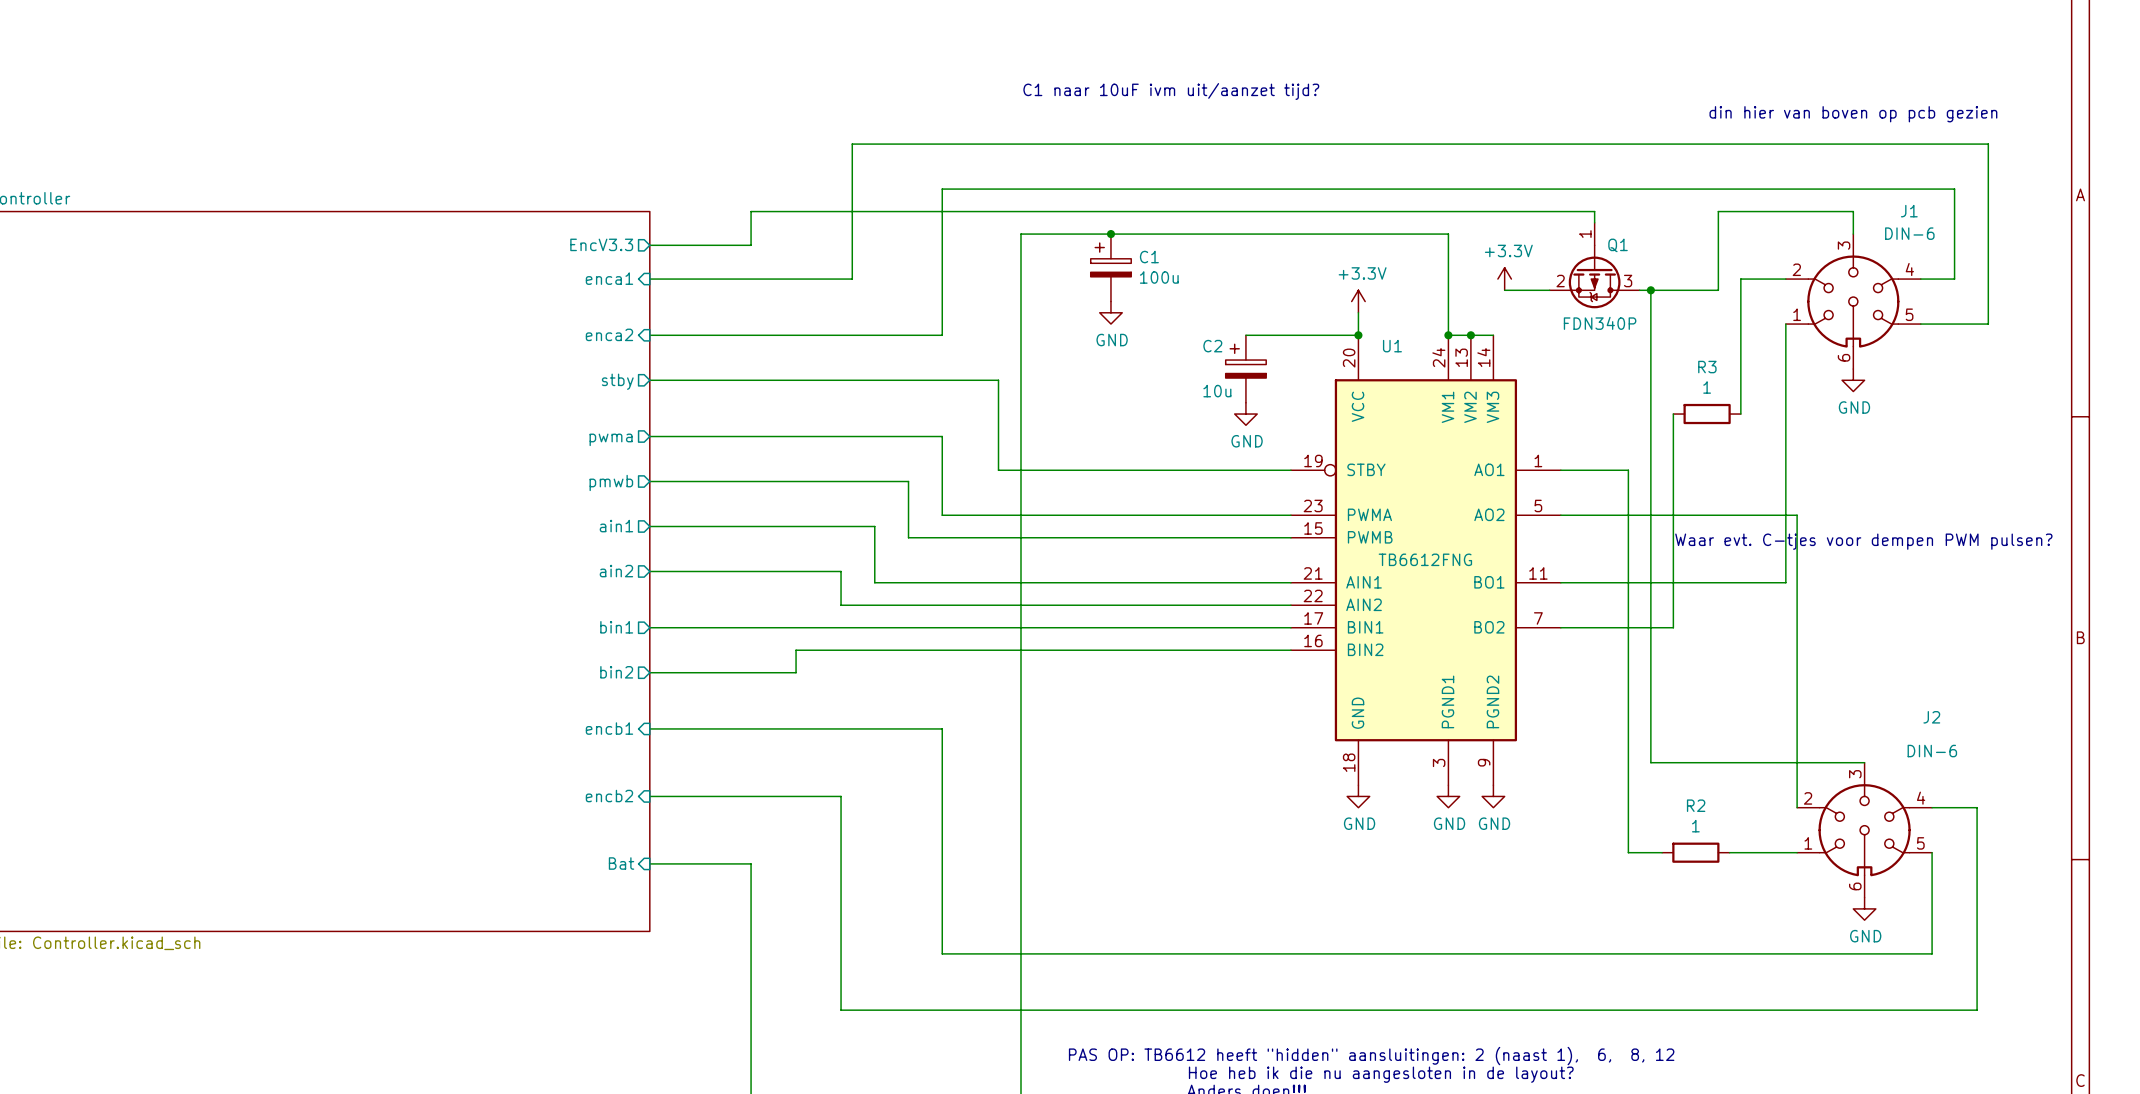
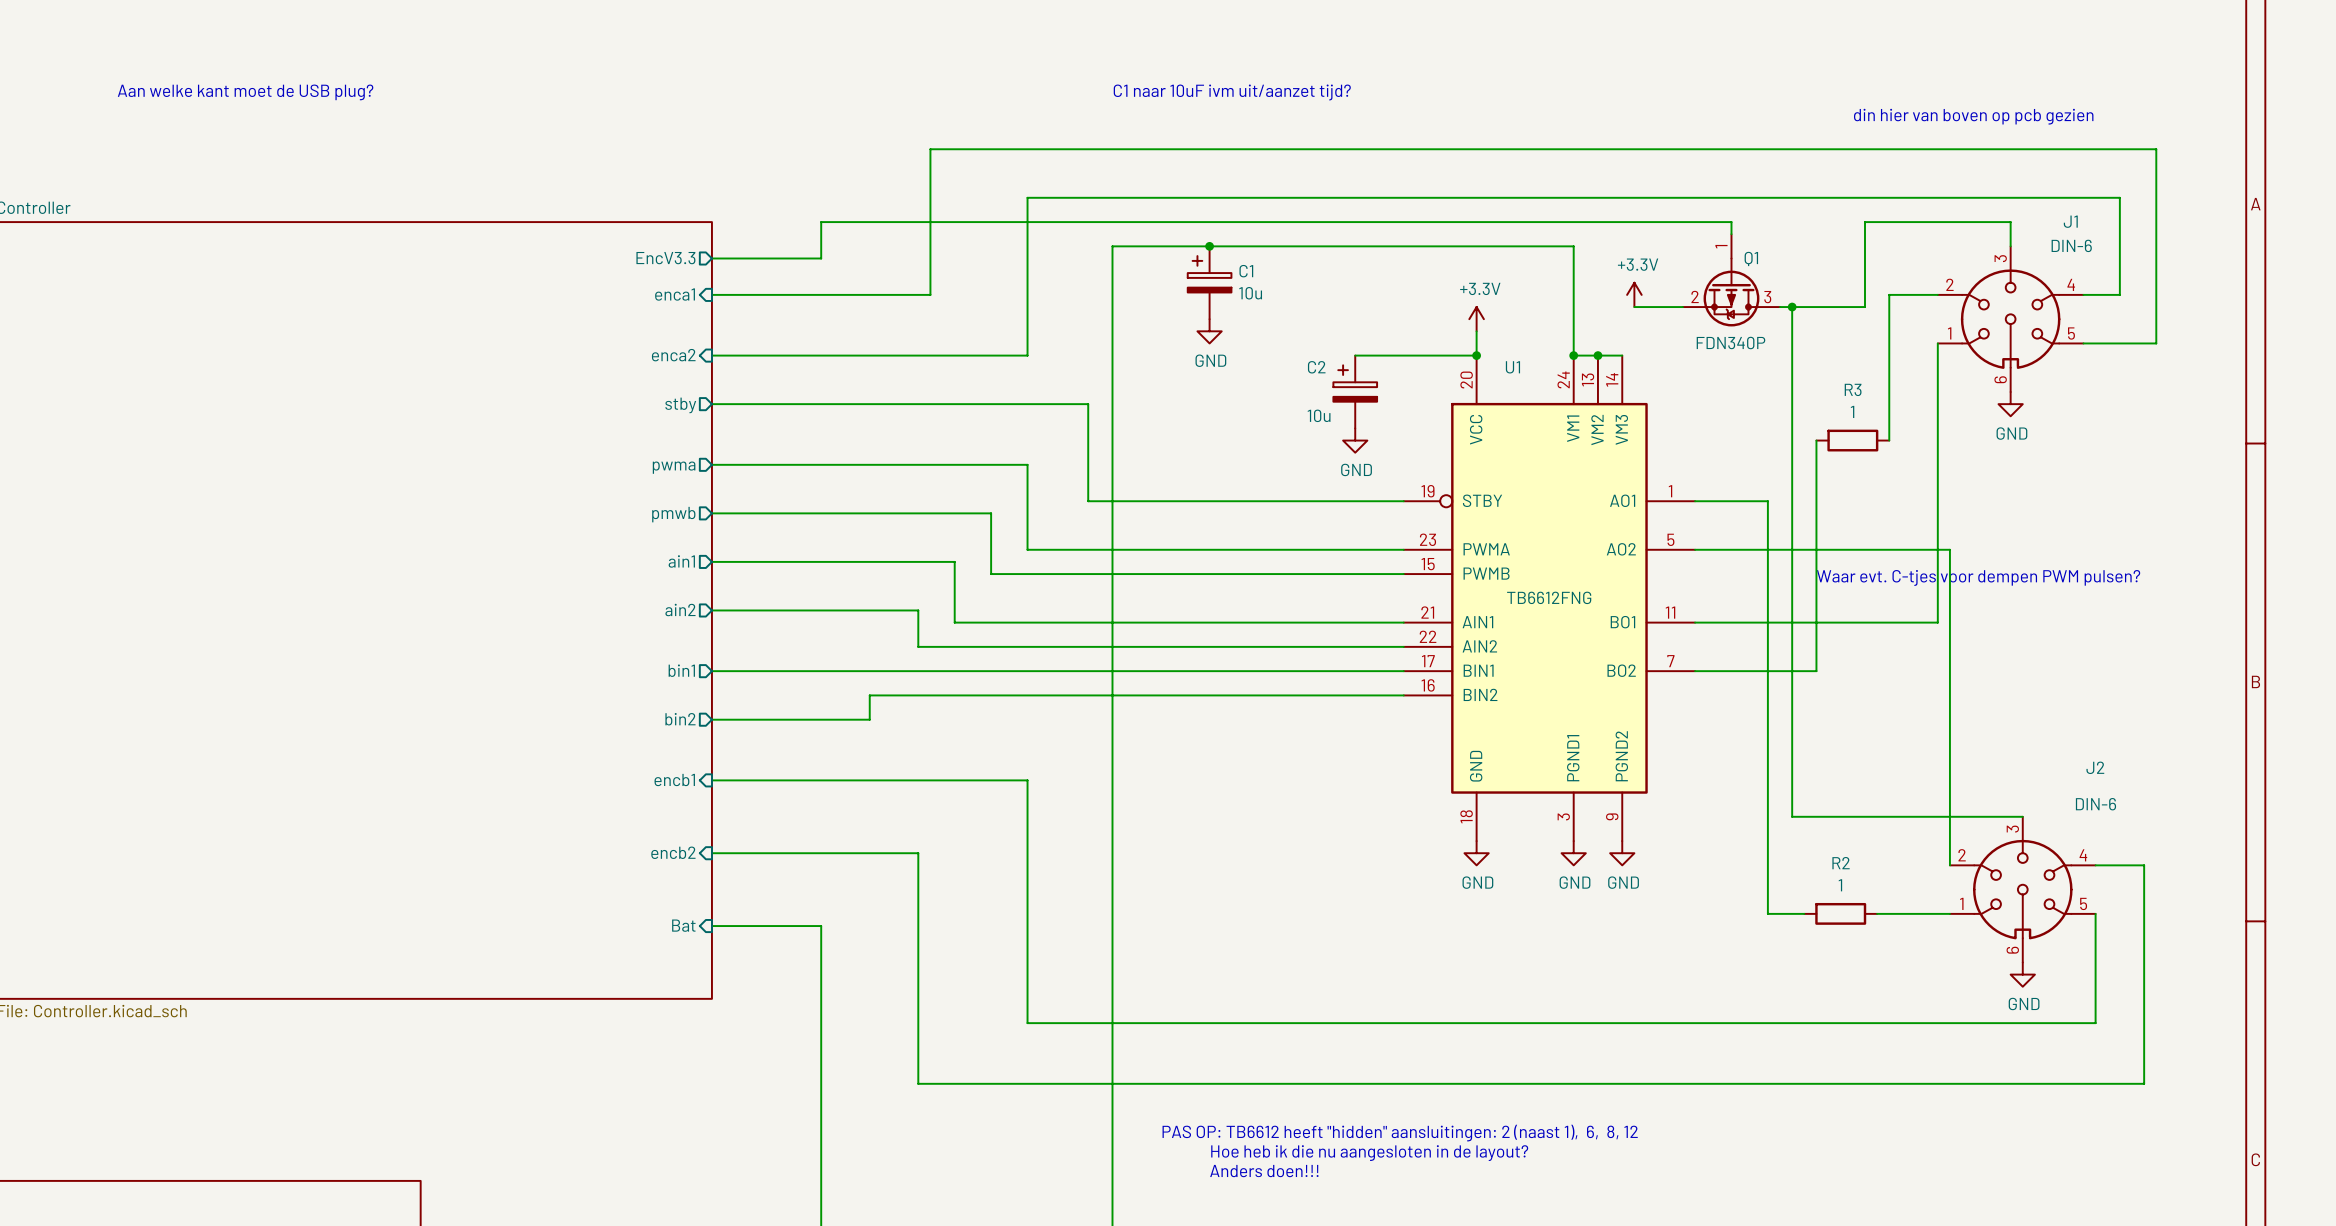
text: none -> Aan welke kant moet de USB plug? (245, 92)
C1 value: 100u (1159, 277) -> 10u (1250, 293)

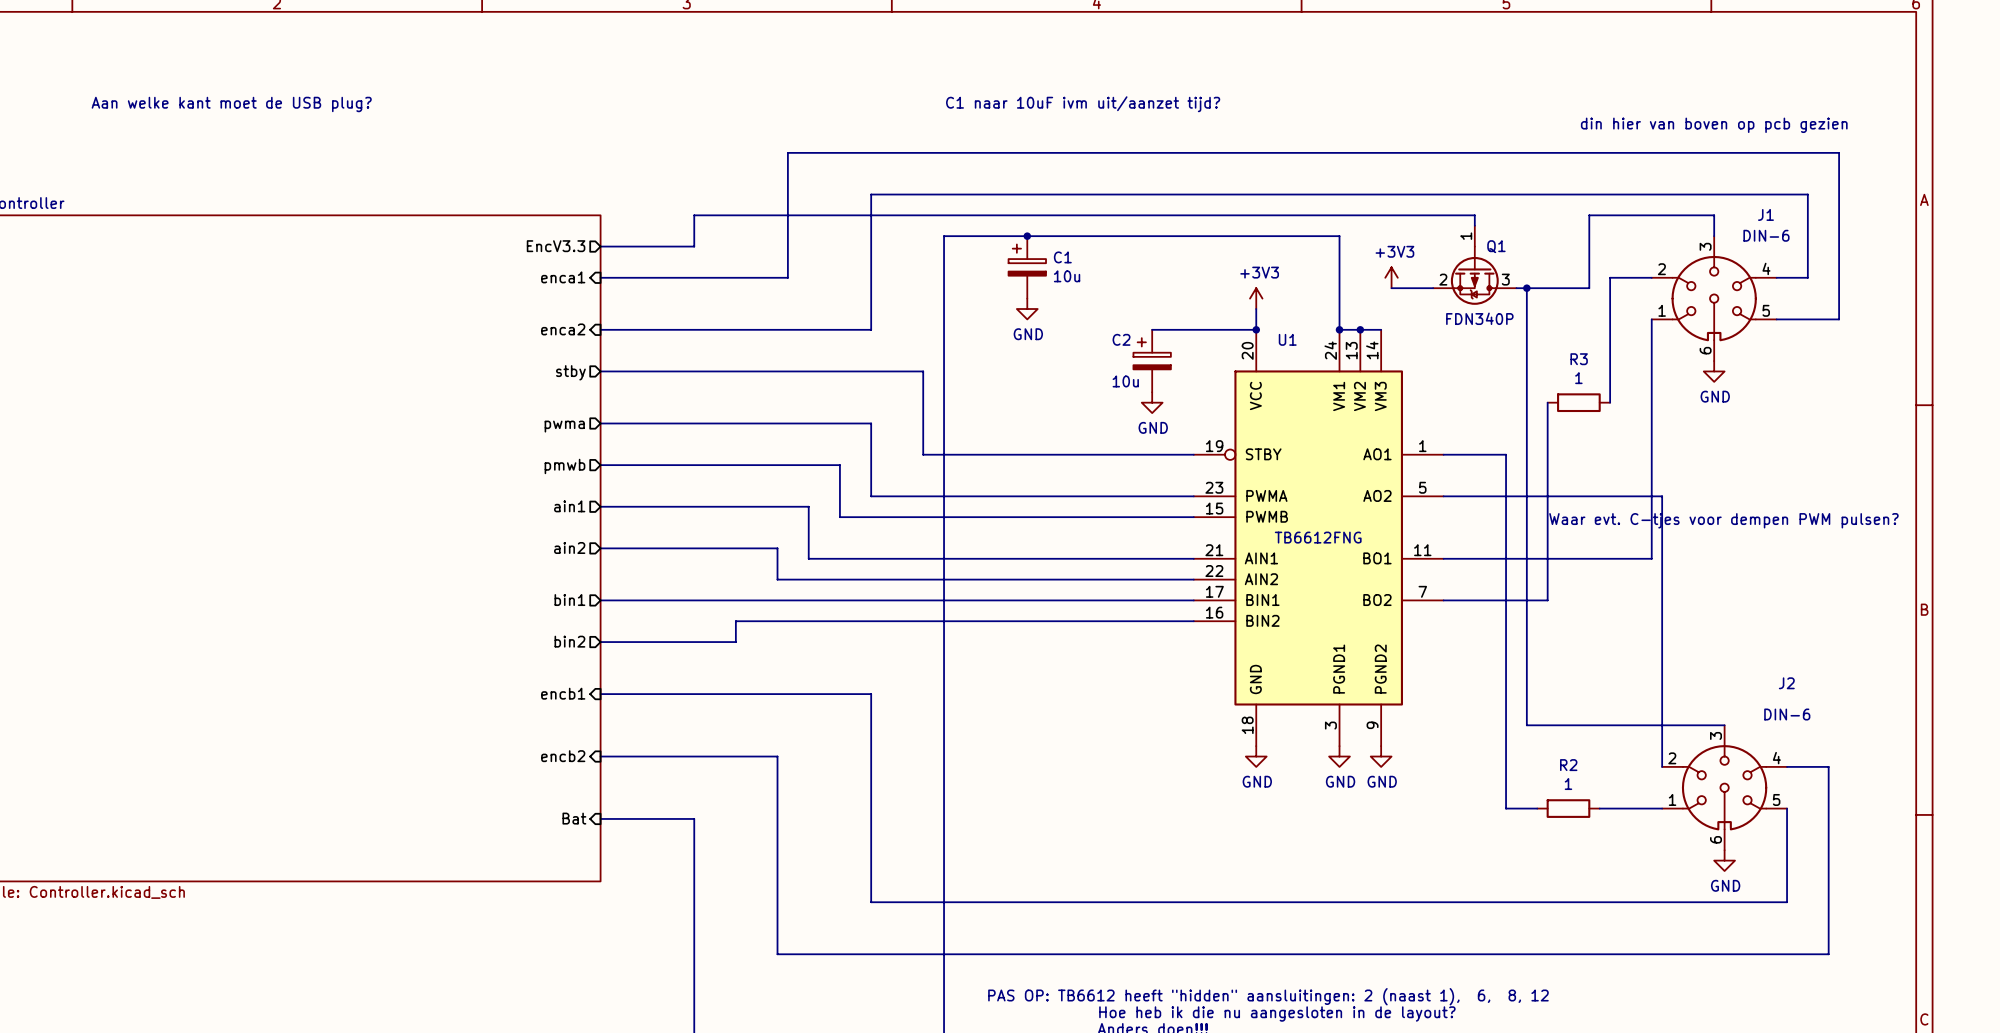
power symbol: +3.3V (1634, 294) -> +3V3 (1391, 277)
power symbol: +3.3V (1476, 319) -> +3V3 (1256, 298)

